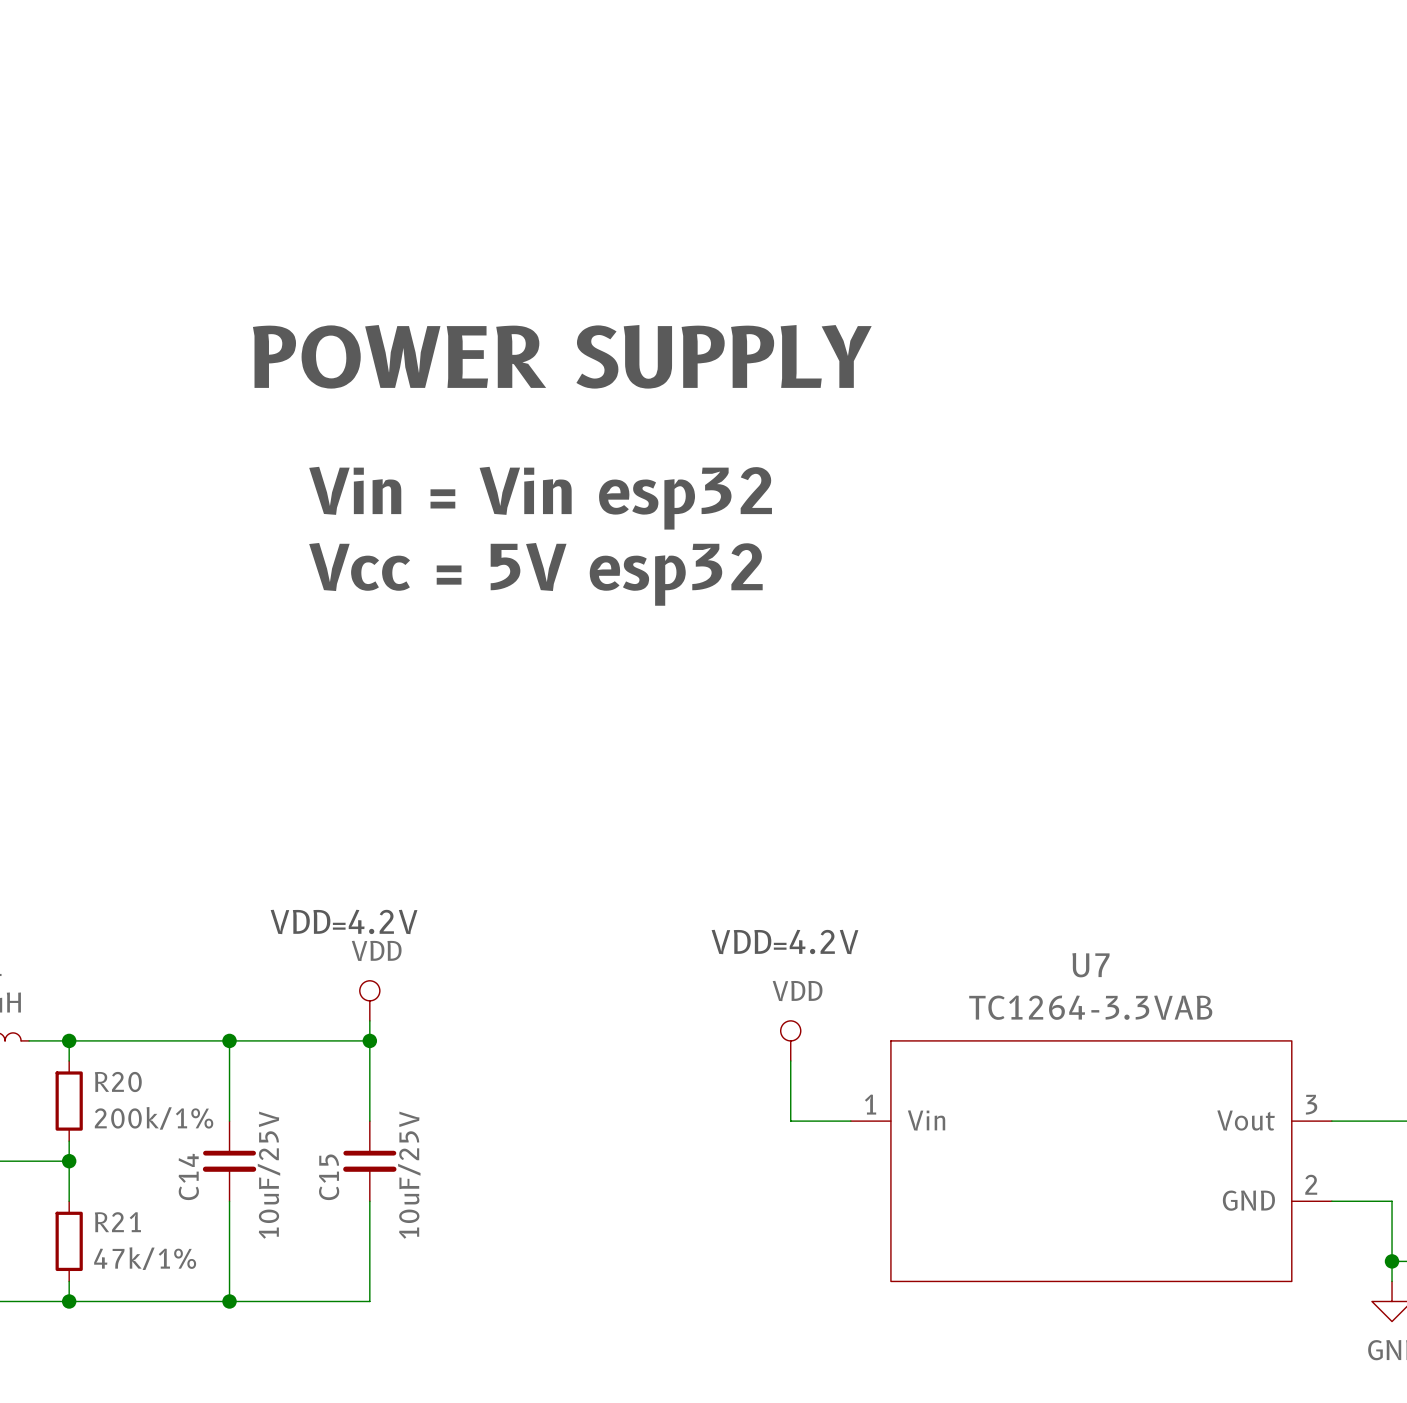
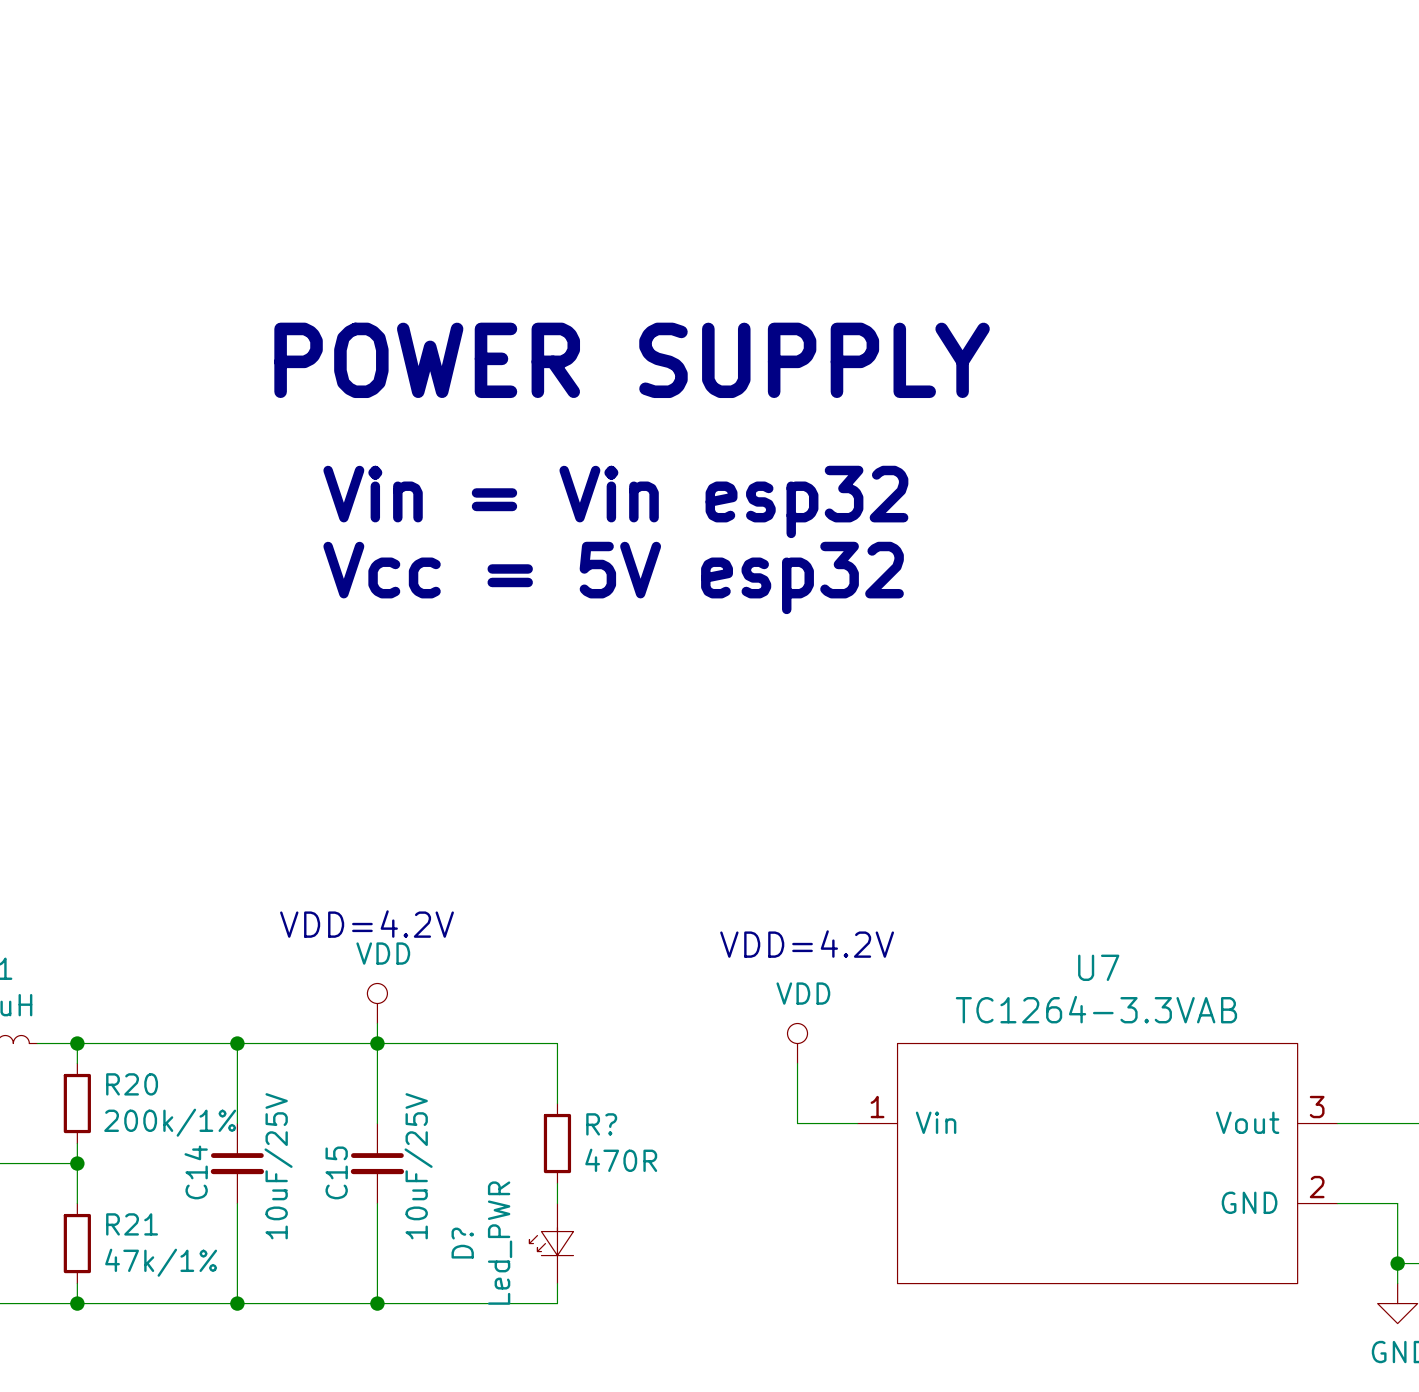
wire: none -> (377, 1043) (557, 1043) (557, 1103)
R?: none -> 470R (557, 1143)
wire: none -> (557, 1183) (557, 1203)
D?: none -> Led_PWR (551, 1243)
wire: none -> (557, 1283) (557, 1303) (377, 1303)
junction: none -> (377, 1303)

